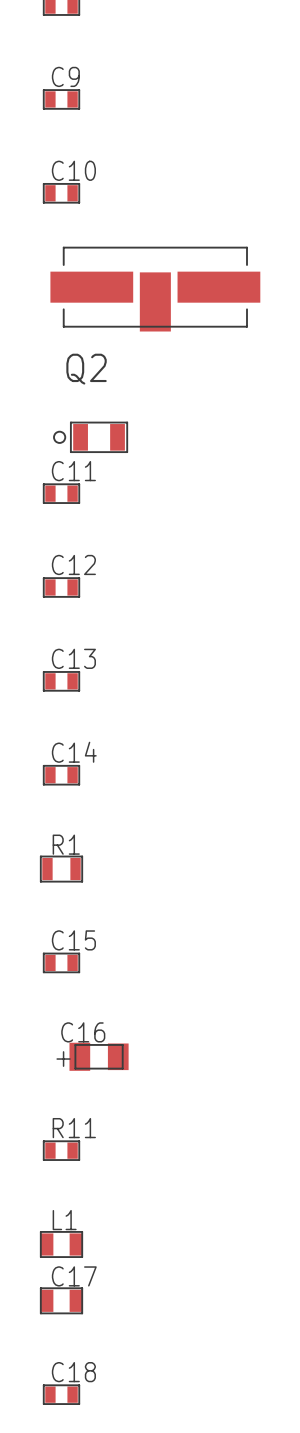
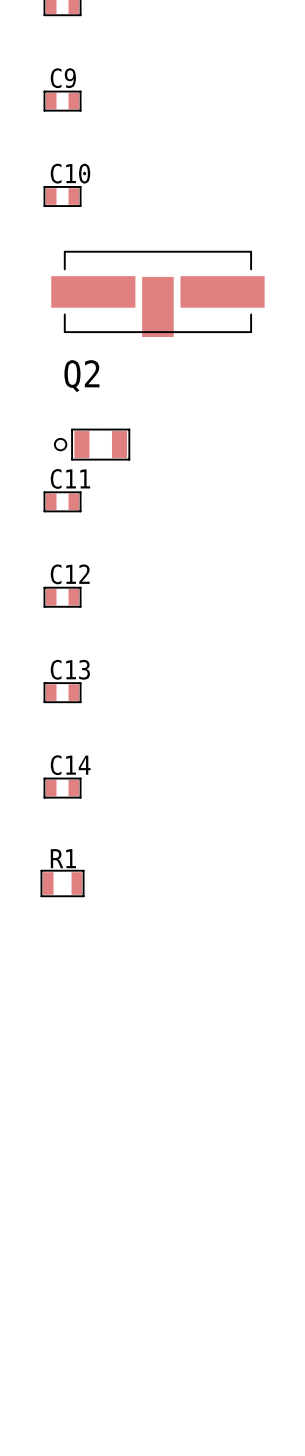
C15: (61, 962) -> none
C16: (99, 1056) -> none
R11: (61, 1150) -> none
L1: (61, 1244) -> none
C17: (61, 1300) -> none
C18: (61, 1394) -> none

